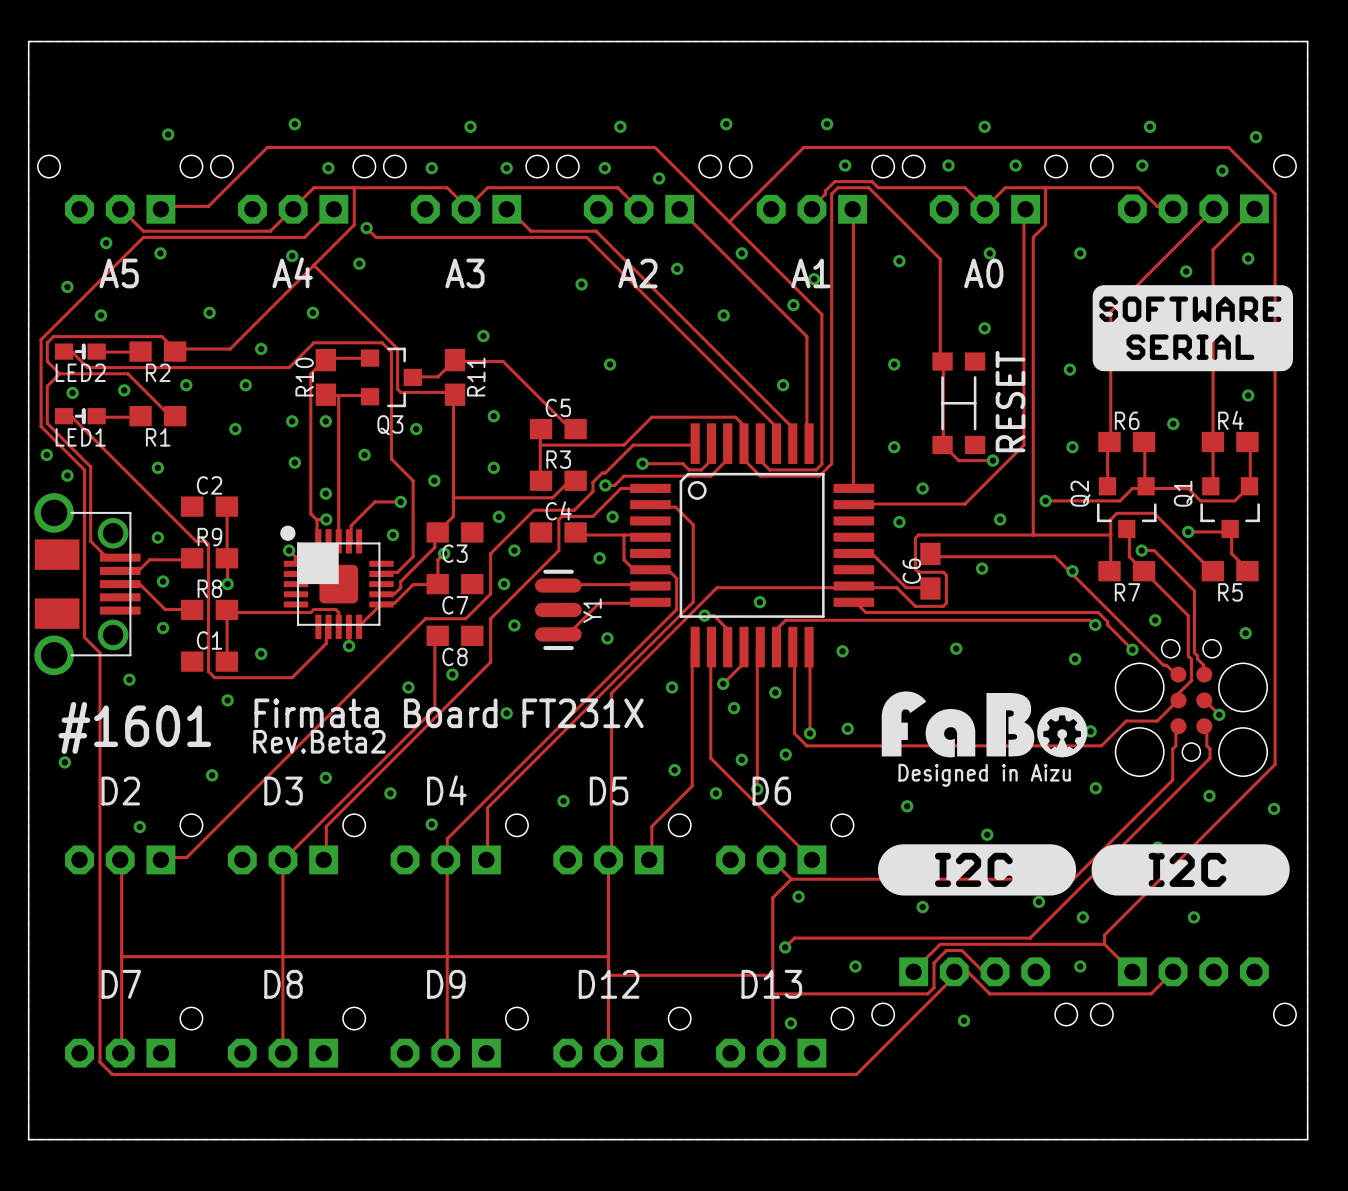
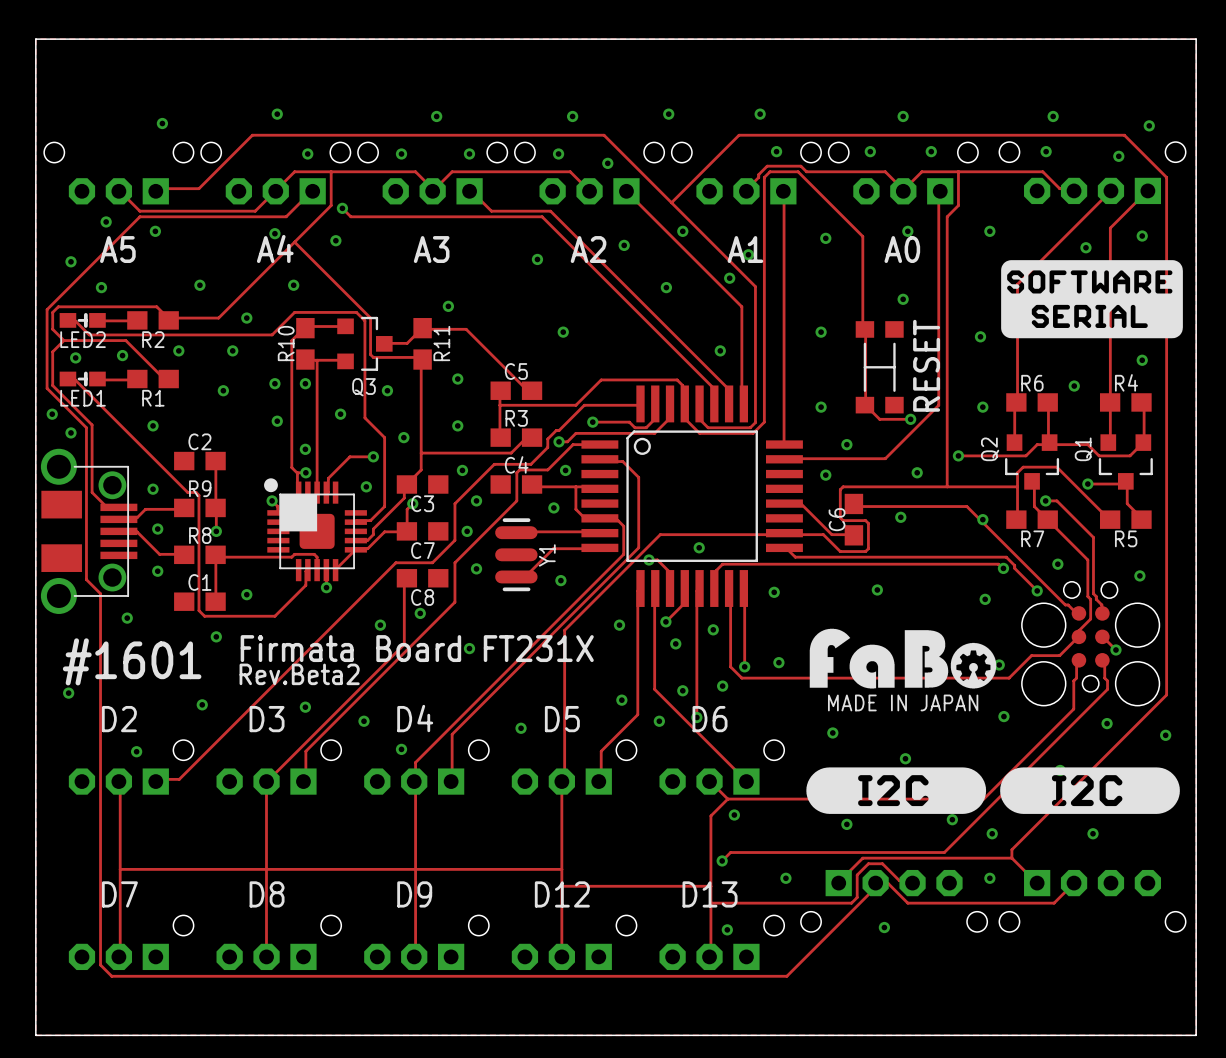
text: Designed in Aizu (984, 775) -> MADE IN JAPAN (903, 702)

